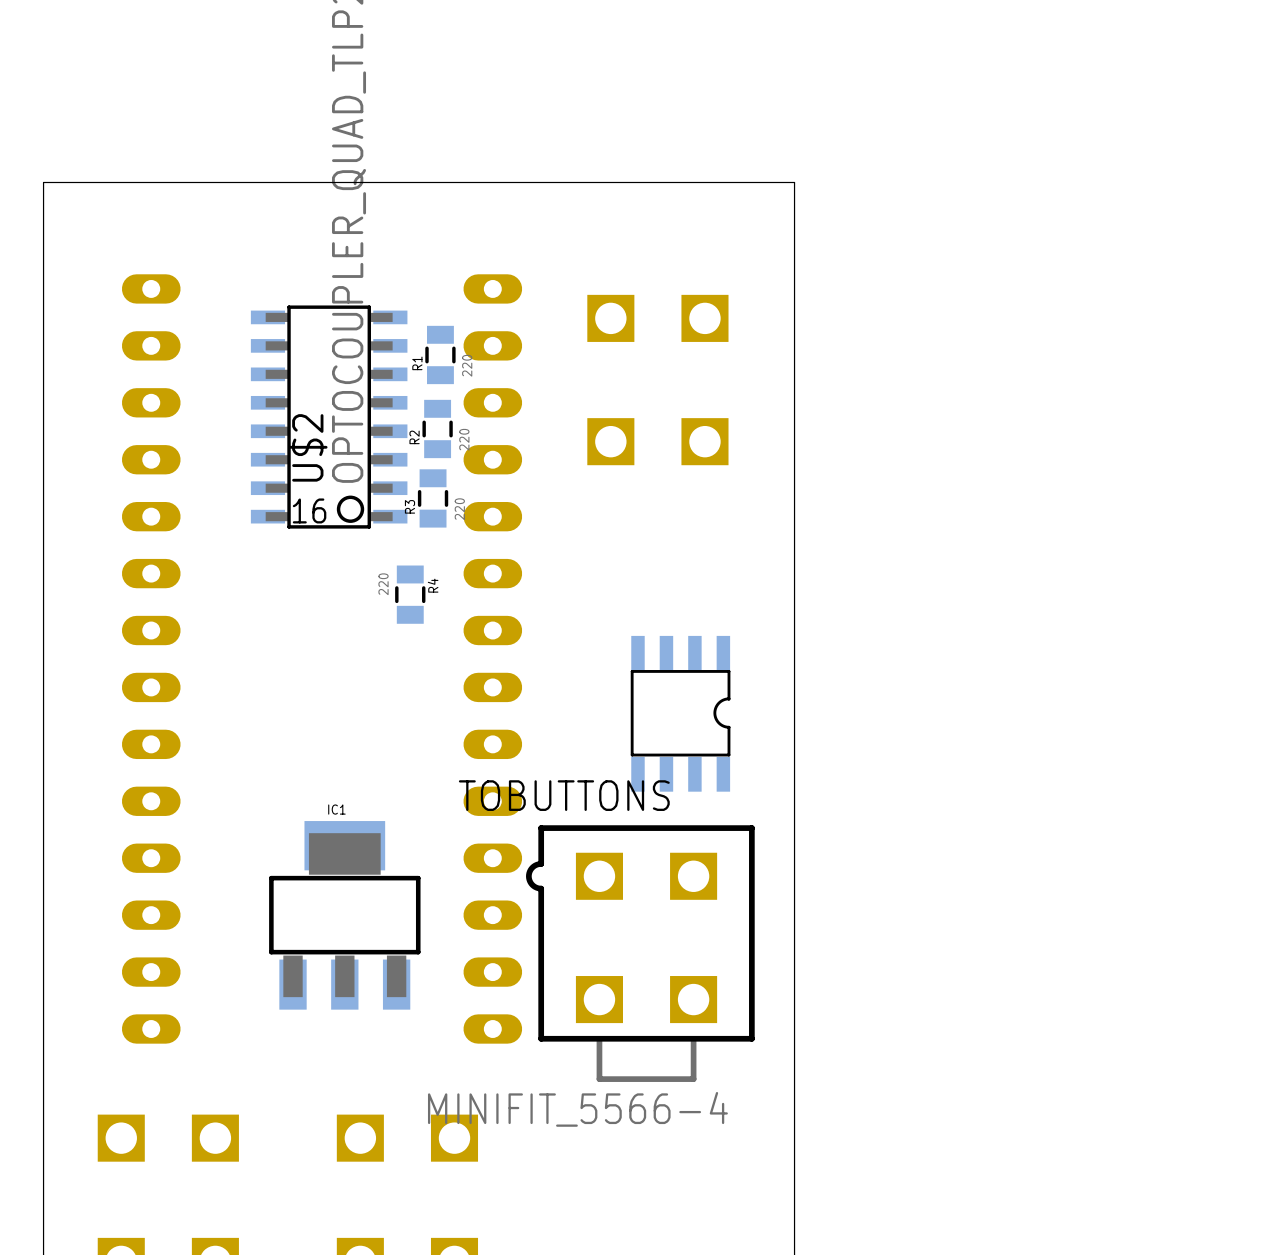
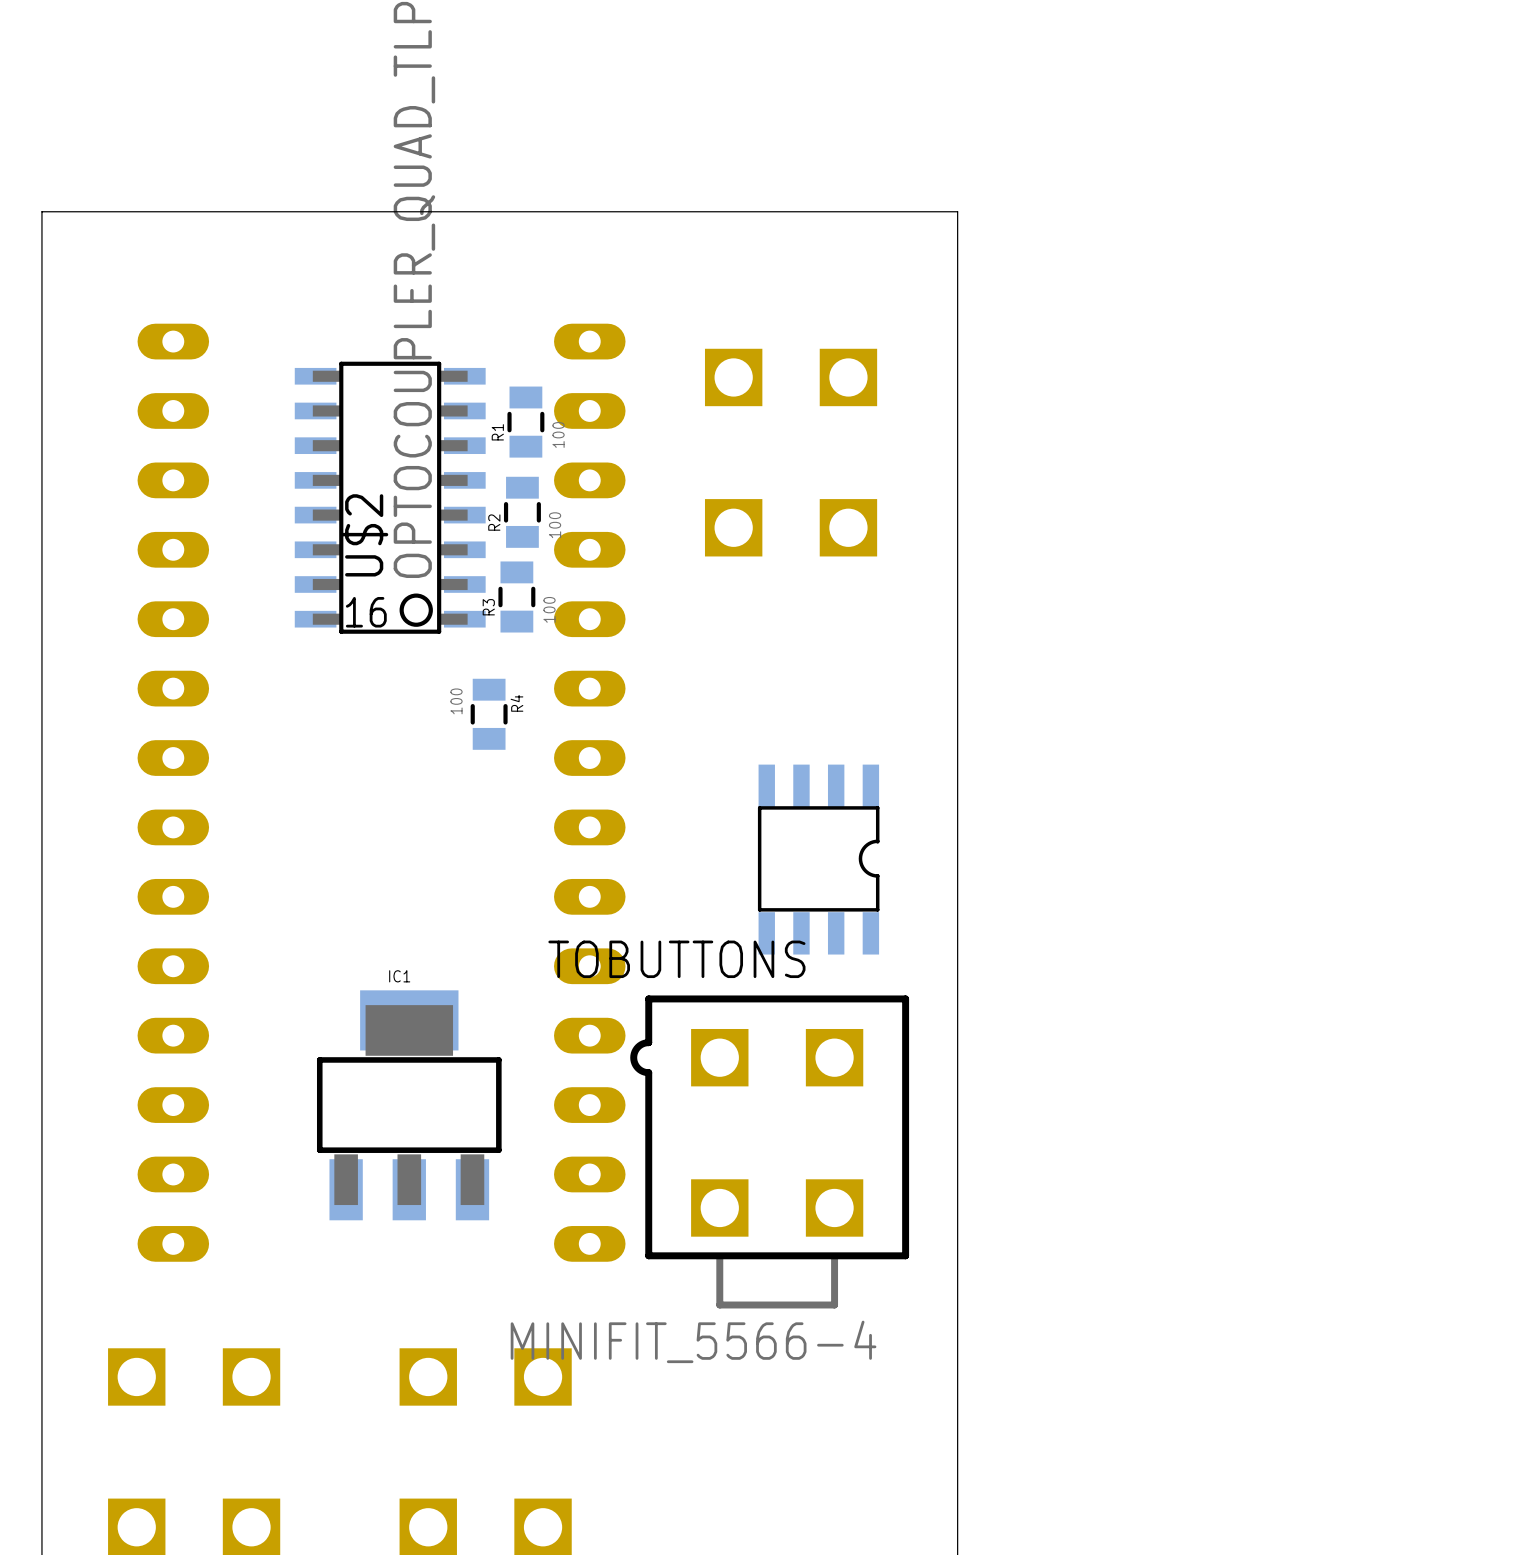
R1 value: 220 (467, 365) -> 100 (558, 434)
R2 value: 220 (464, 439) -> 100 (555, 525)
R3 value: 220 (459, 509) -> 100 (549, 609)
R4 value: 220 (383, 584) -> 100 (456, 701)

